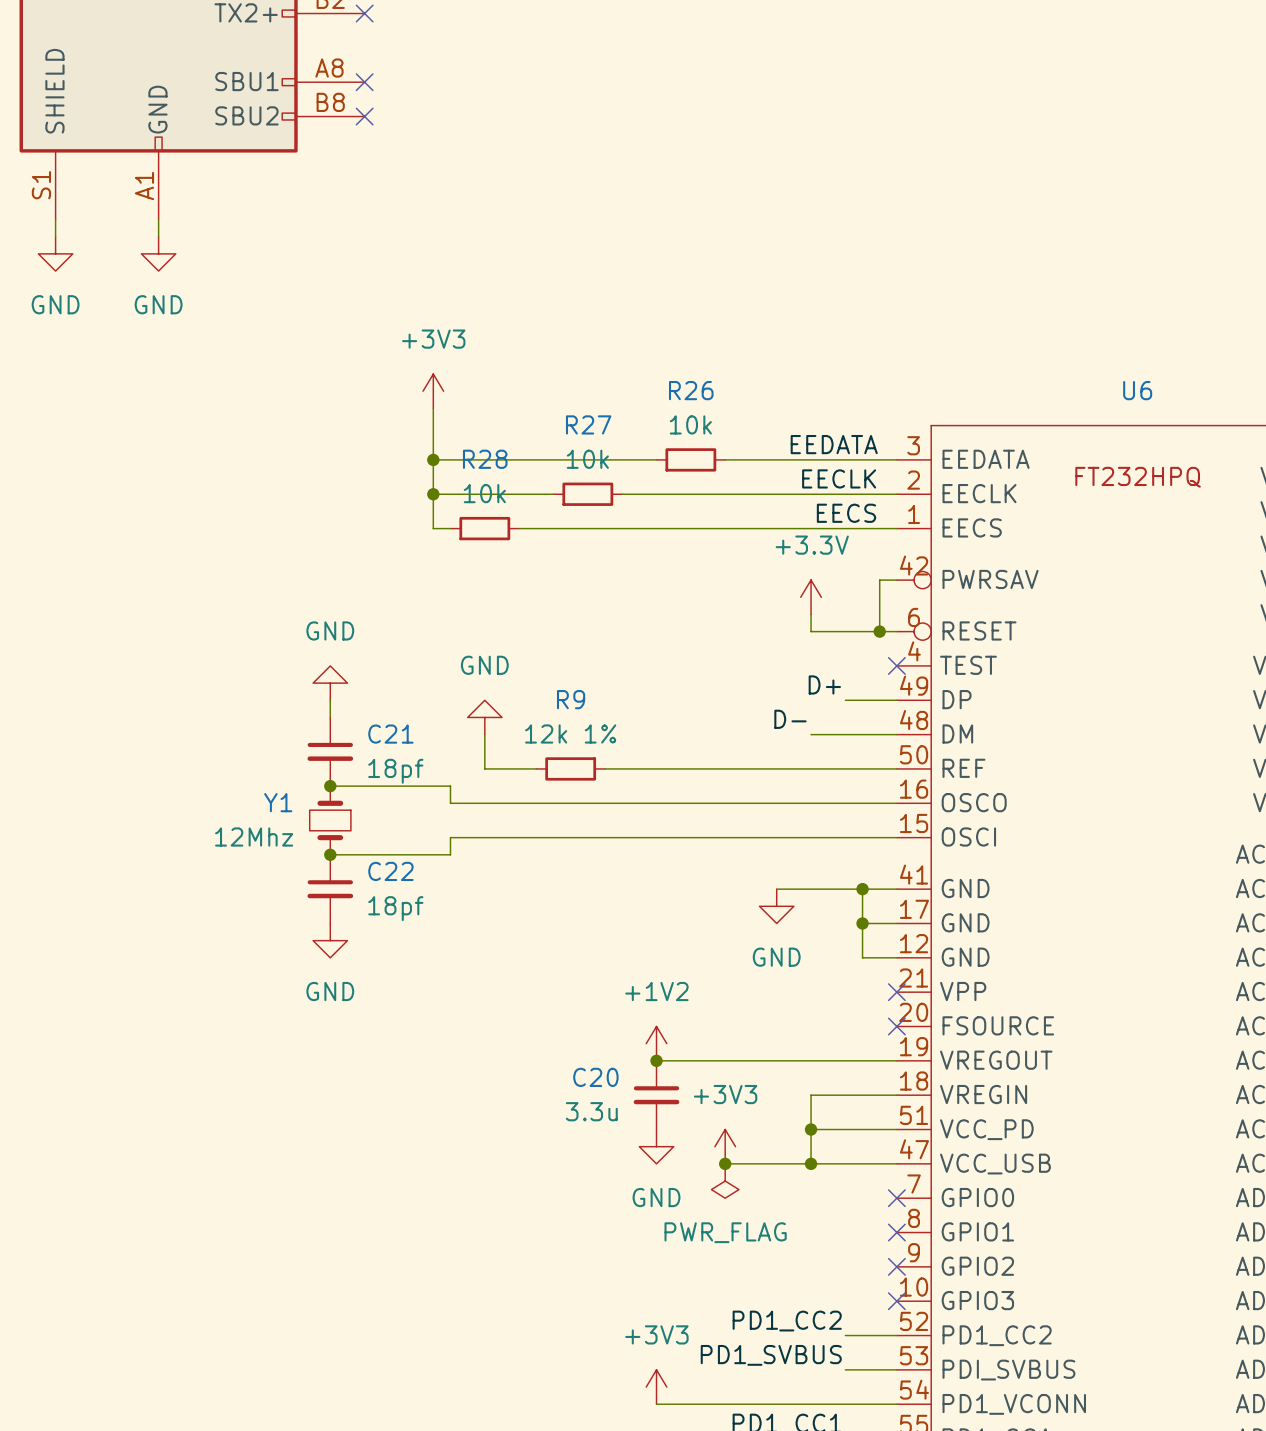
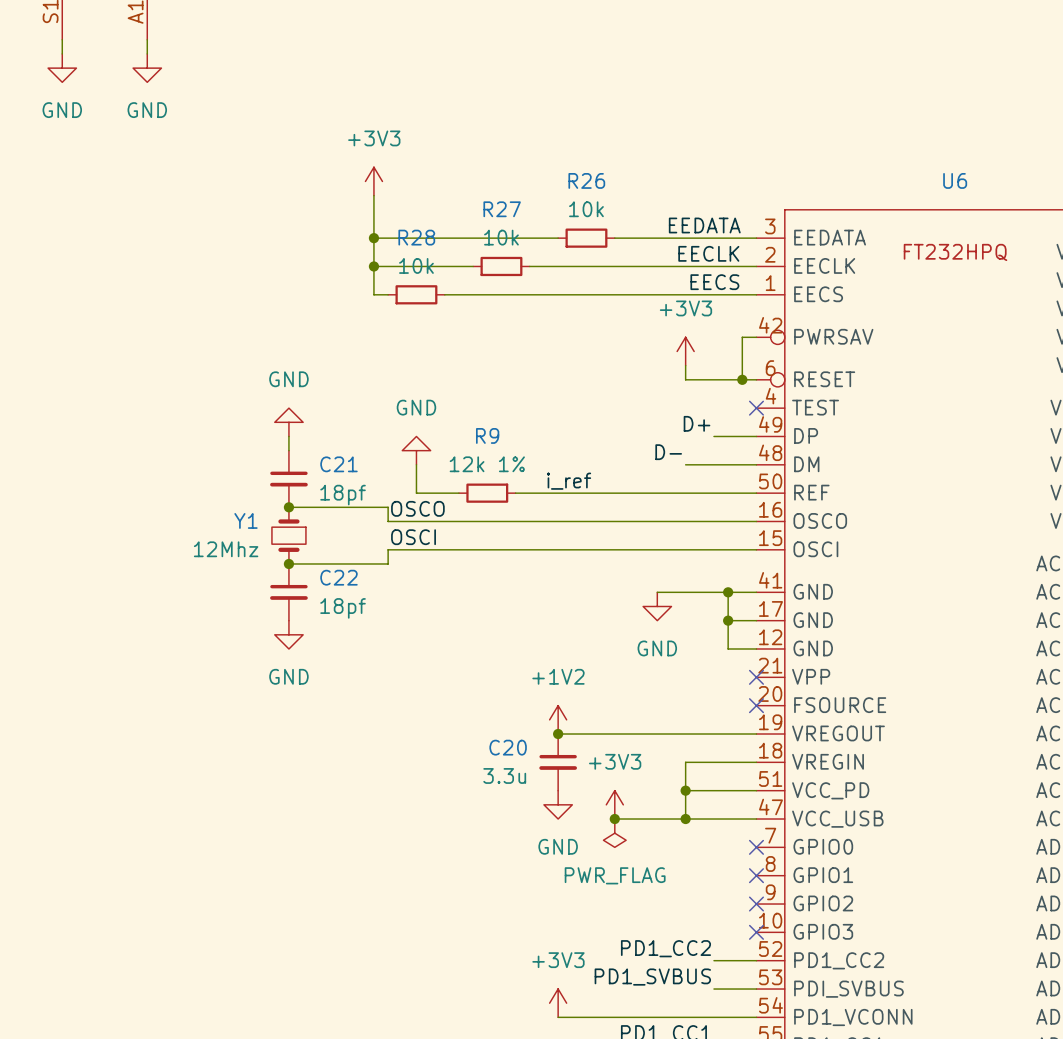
power symbol: +3.3V (811, 597) -> +3V3 (685, 351)
label: none -> i_ref (569, 481)
label: none -> OSCO (417, 508)
label: none -> OSCI (413, 537)

